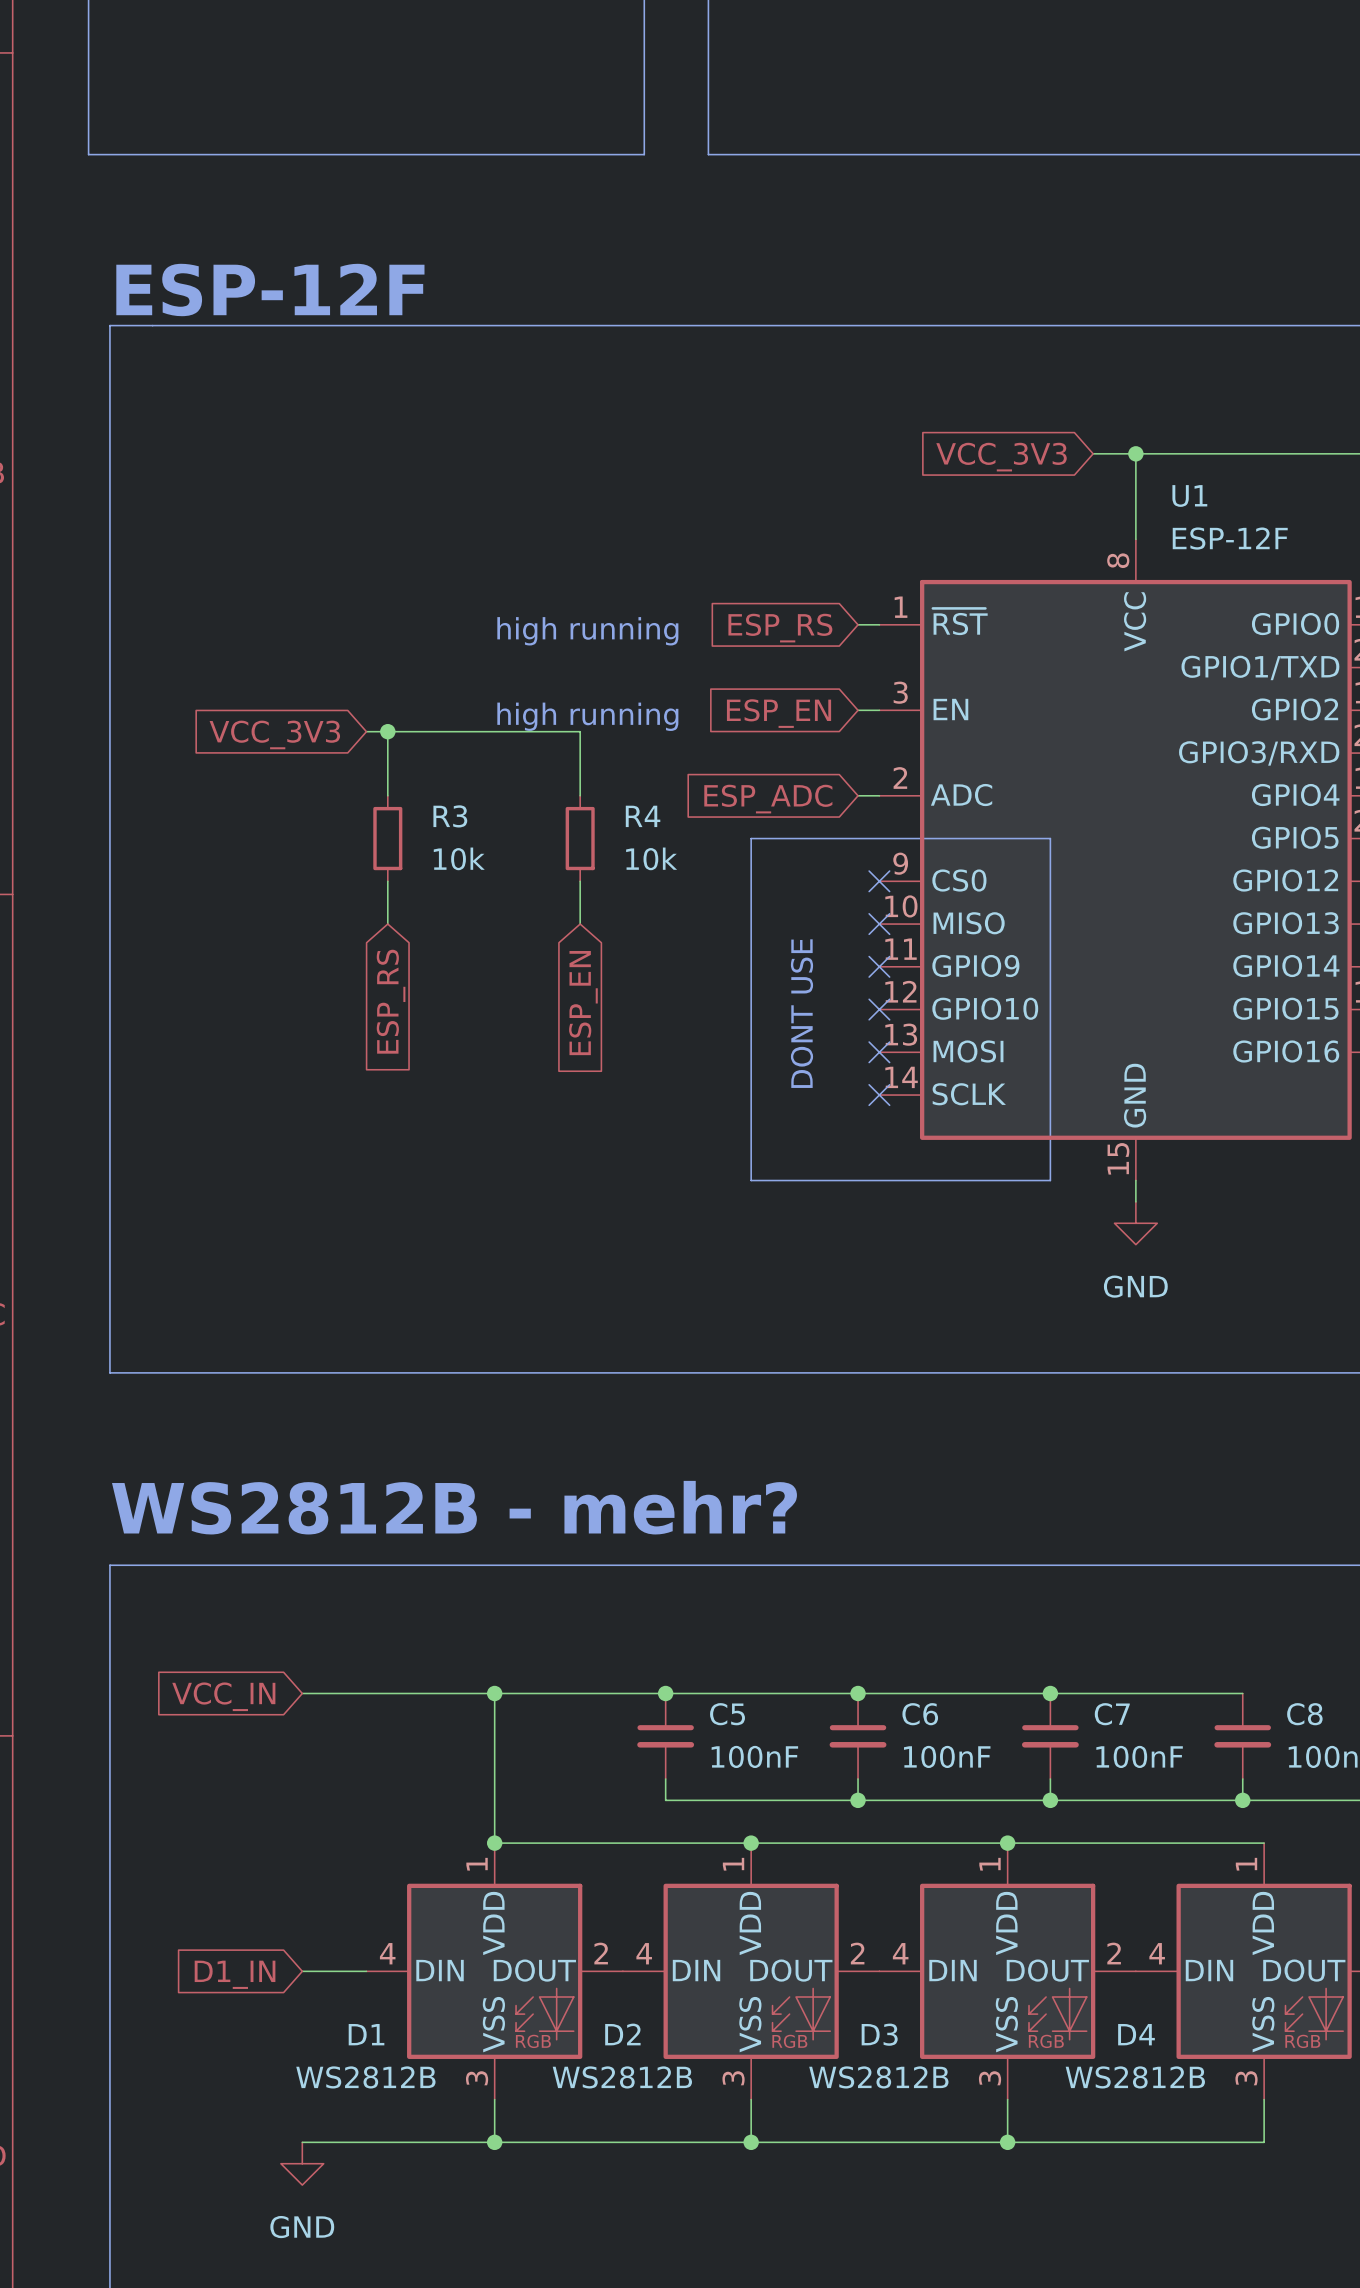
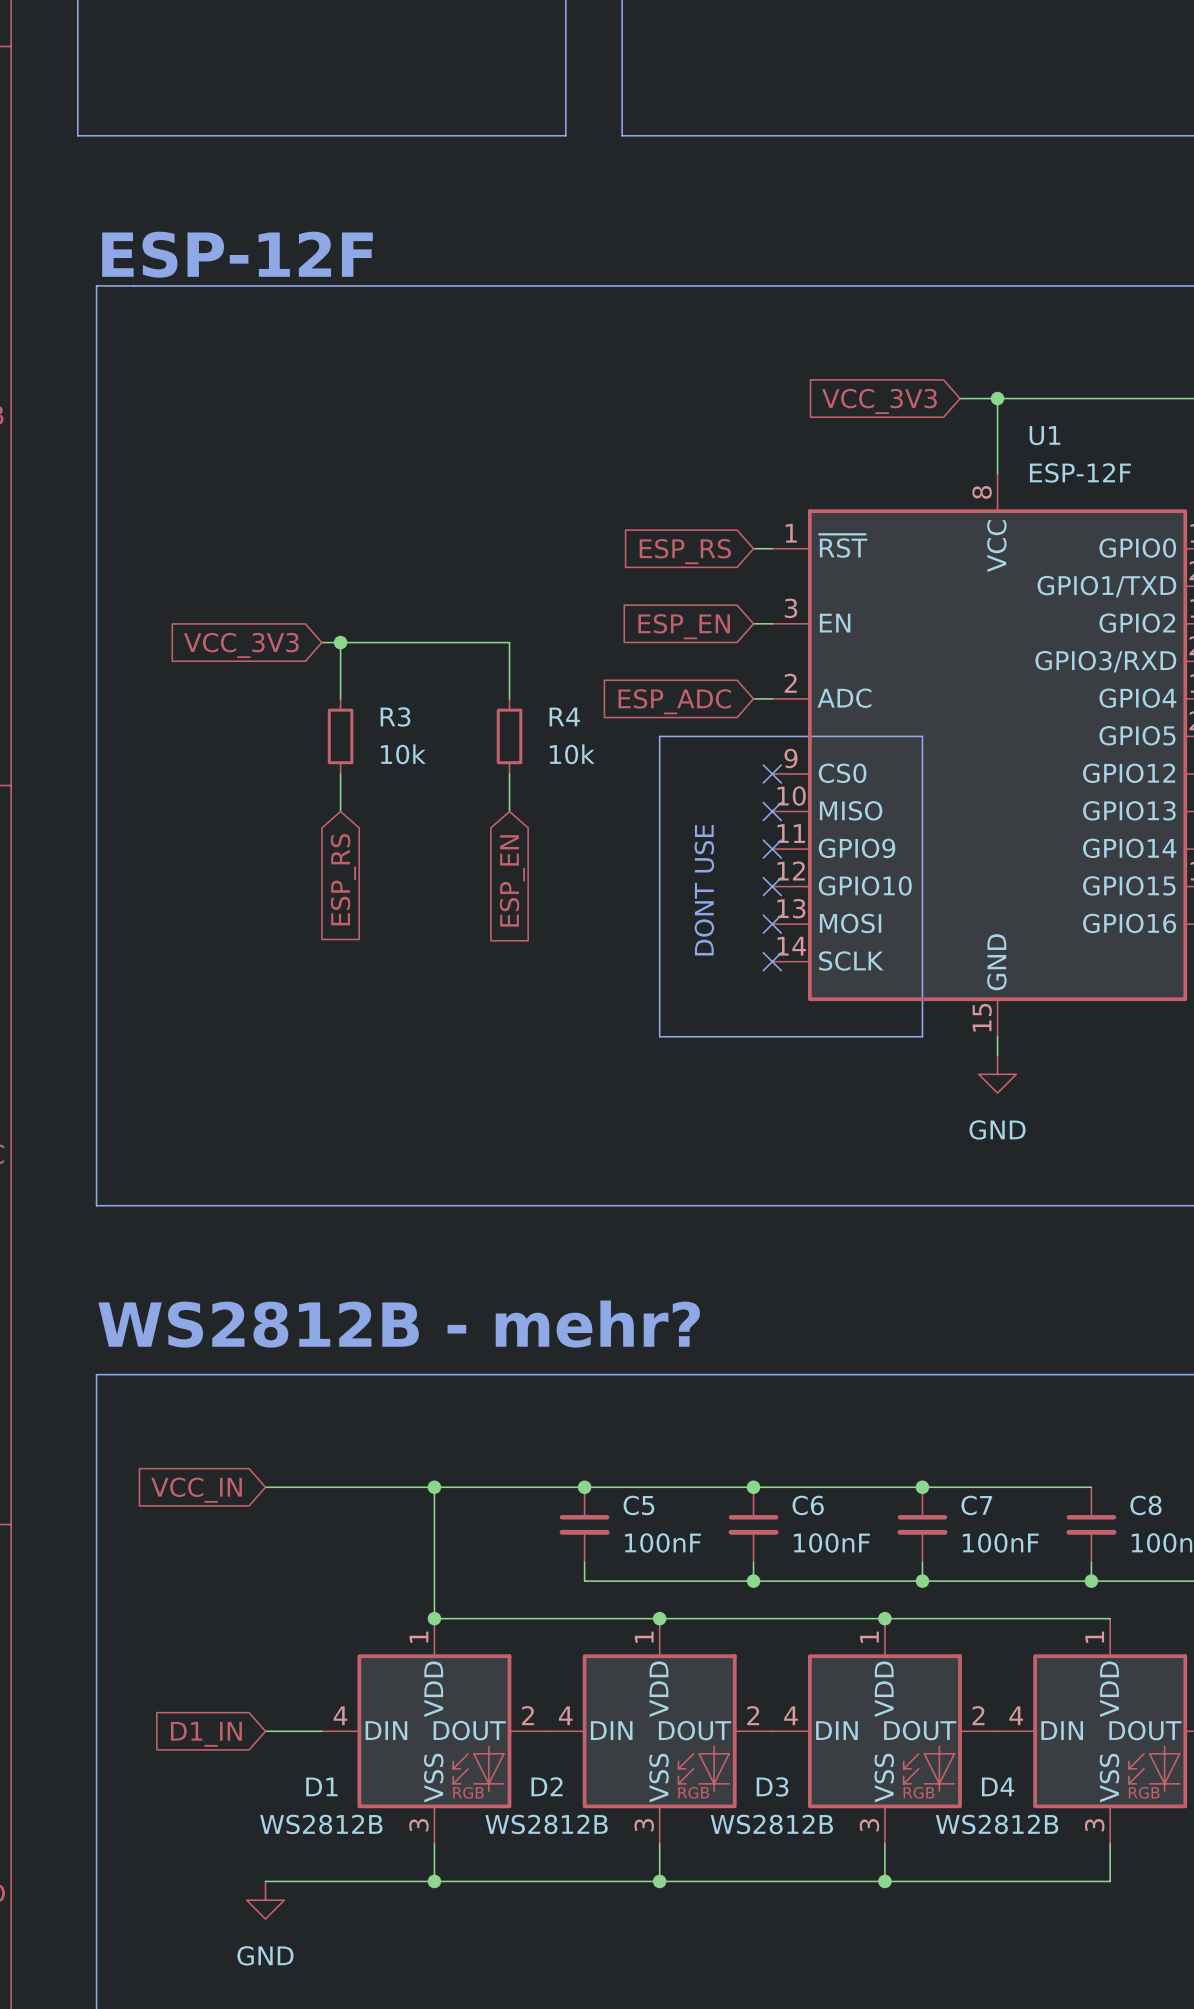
text: high running (587, 631) -> none
text: high running (587, 716) -> none

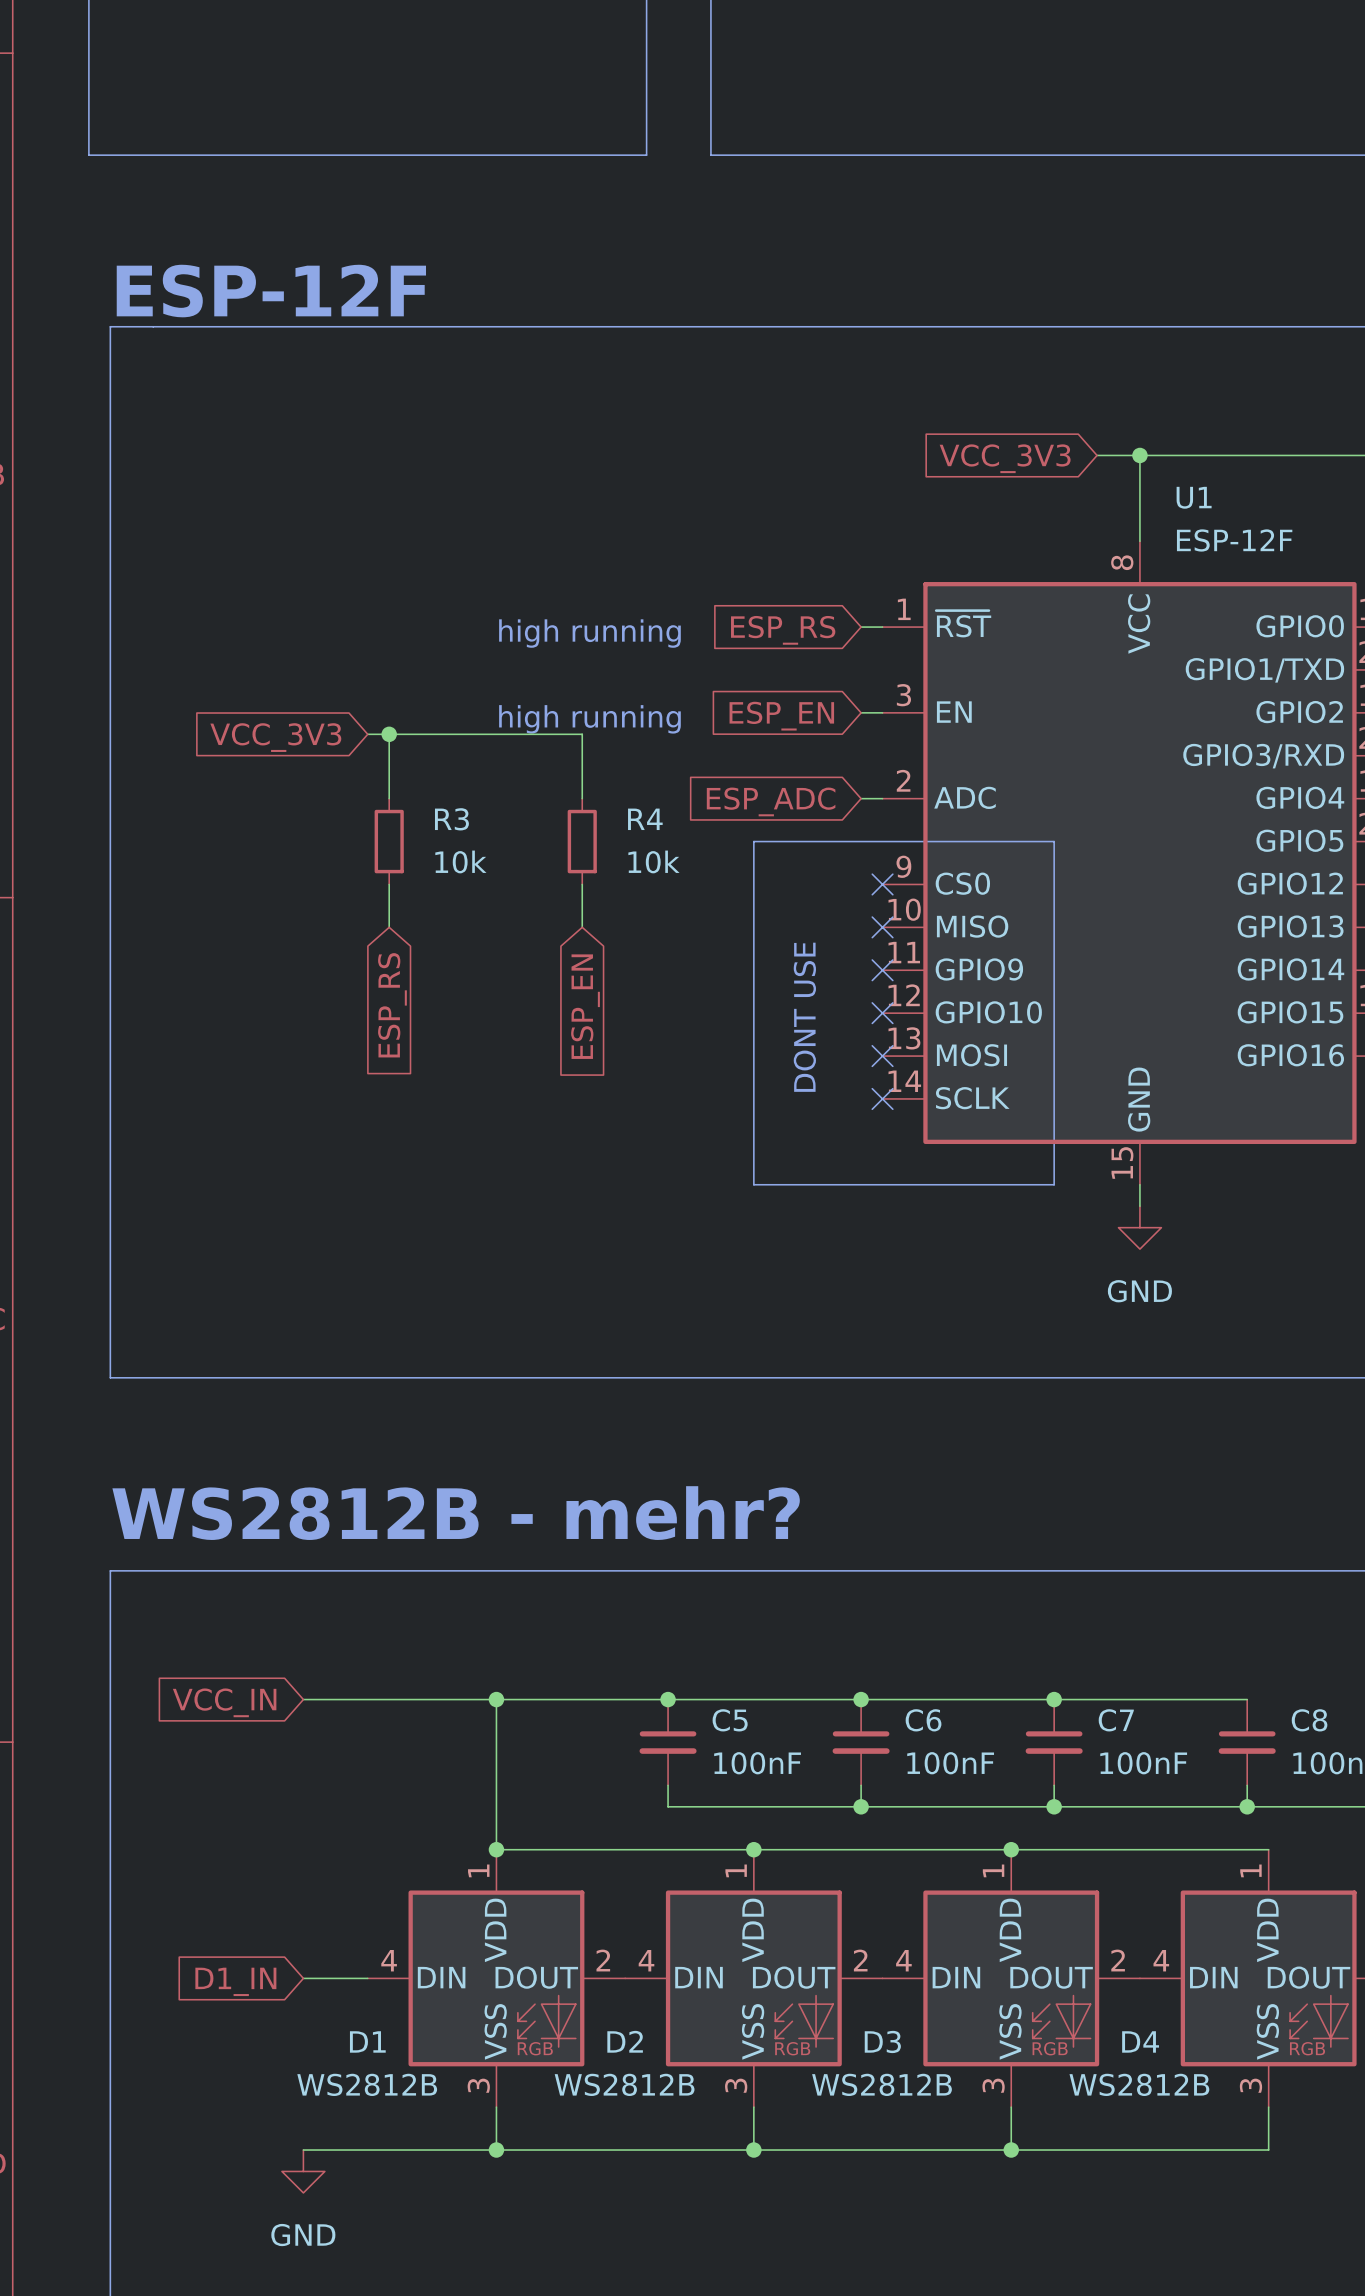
text: none -> high running (589, 633)
text: none -> high running (589, 719)

